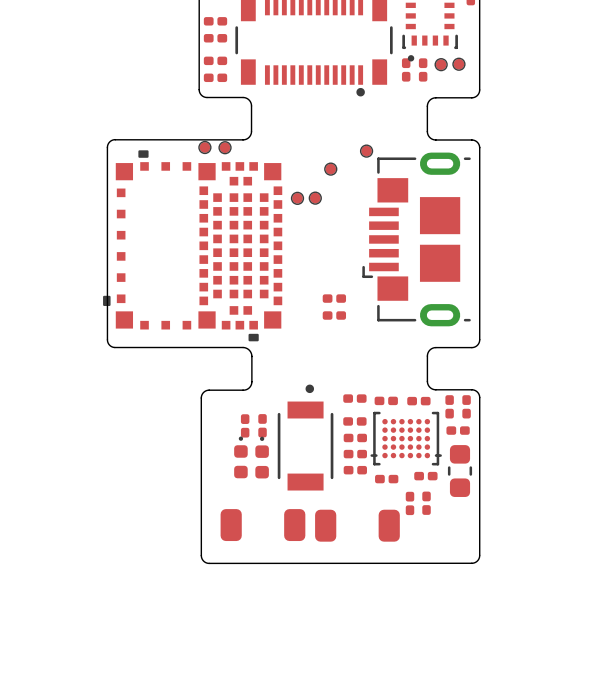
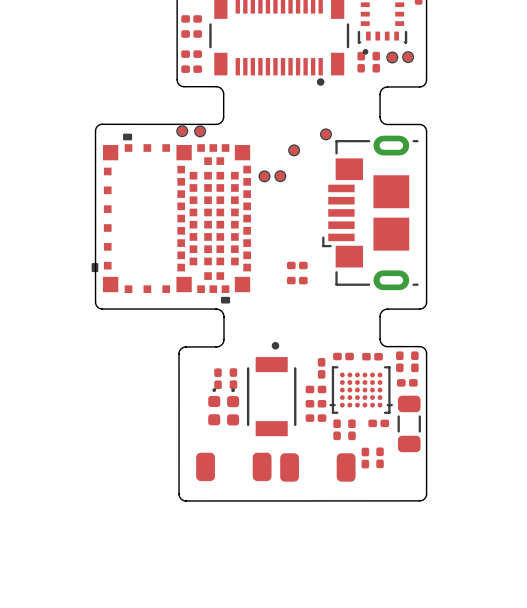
part: (354, 398) -> none
part: none -> (321, 368)
part: (354, 421) -> none
part footprint: [447, 445, 473, 497] -> [397, 395, 421, 453]
part: (386, 479) -> none
part: none -> (337, 429)
part: none -> (351, 429)
part: (410, 503) -> none
part: (426, 503) -> none
part: none -> (380, 457)
part: none -> (365, 458)

